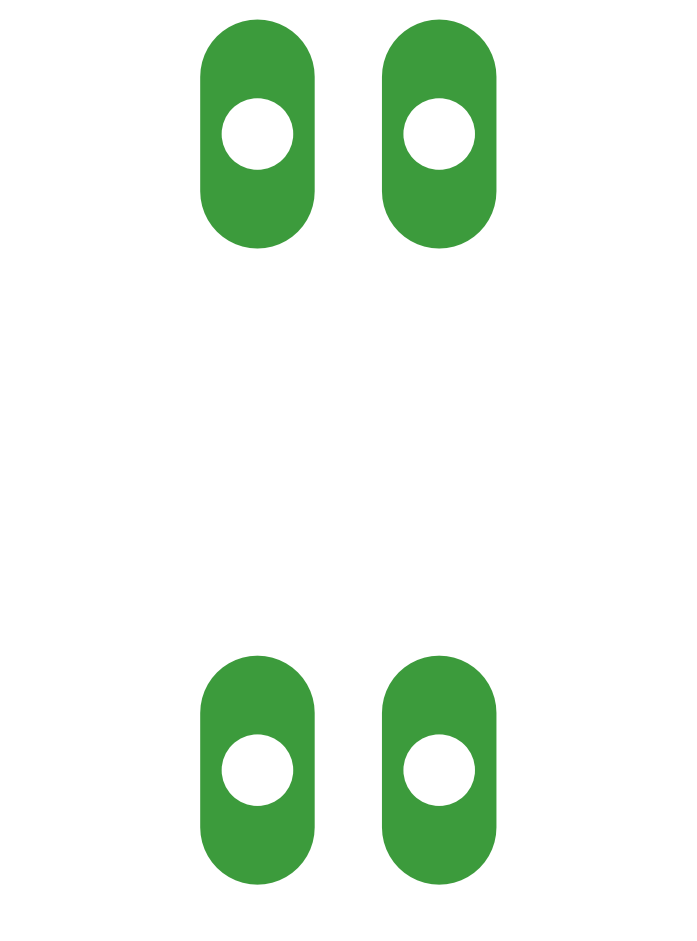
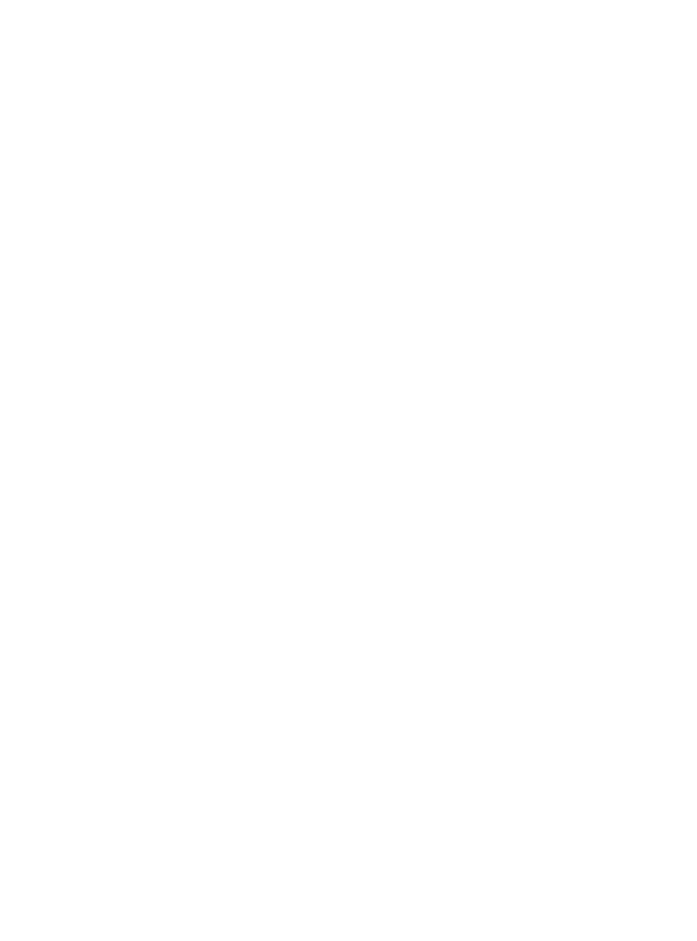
part: (348, 134) -> none
part: (348, 770) -> none

